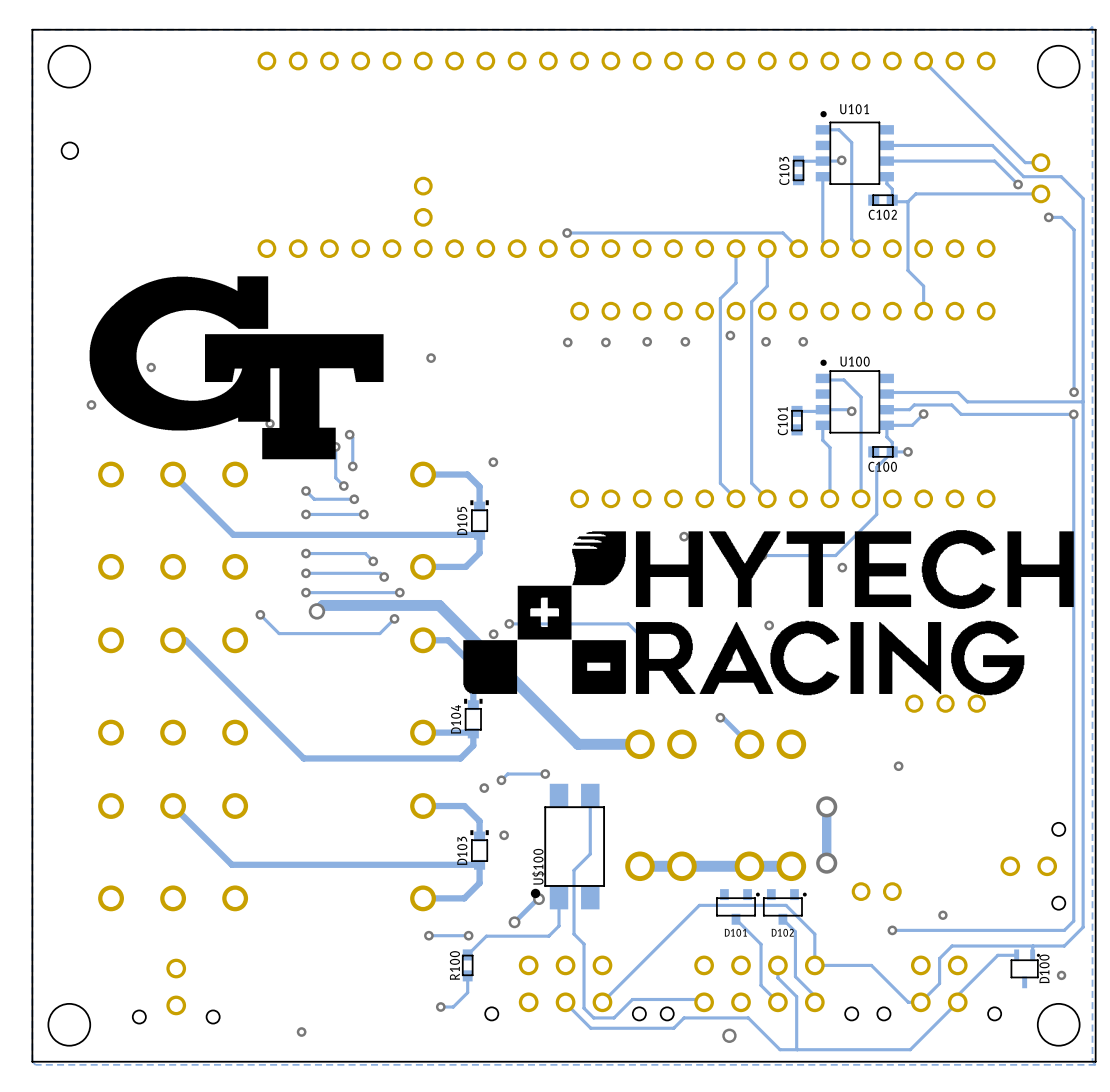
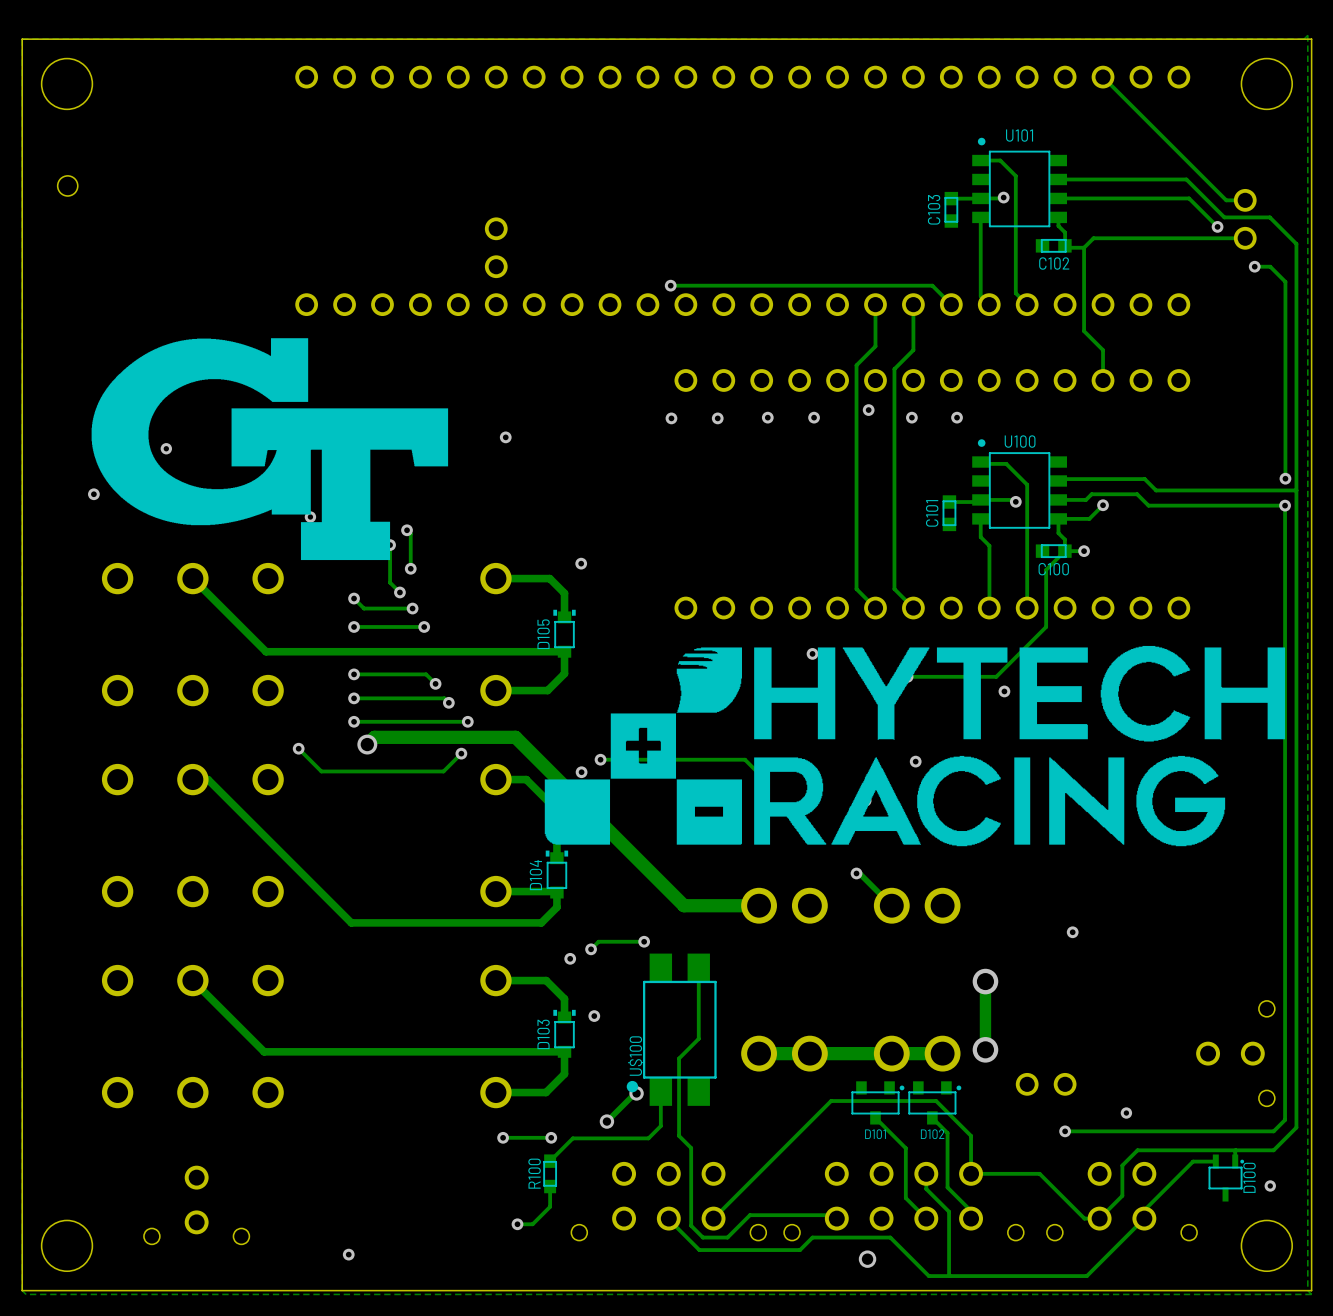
part: (945, 703) -> none

